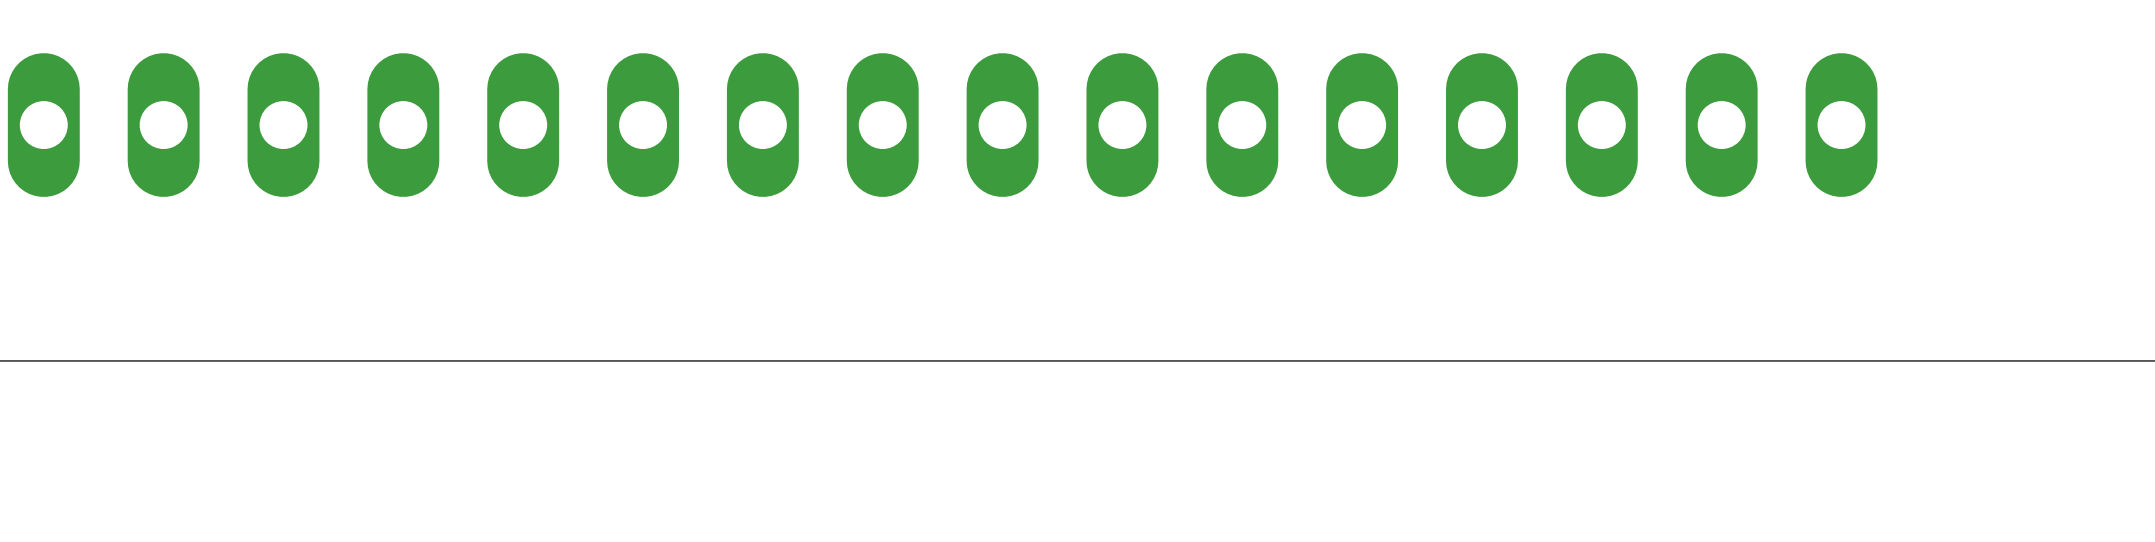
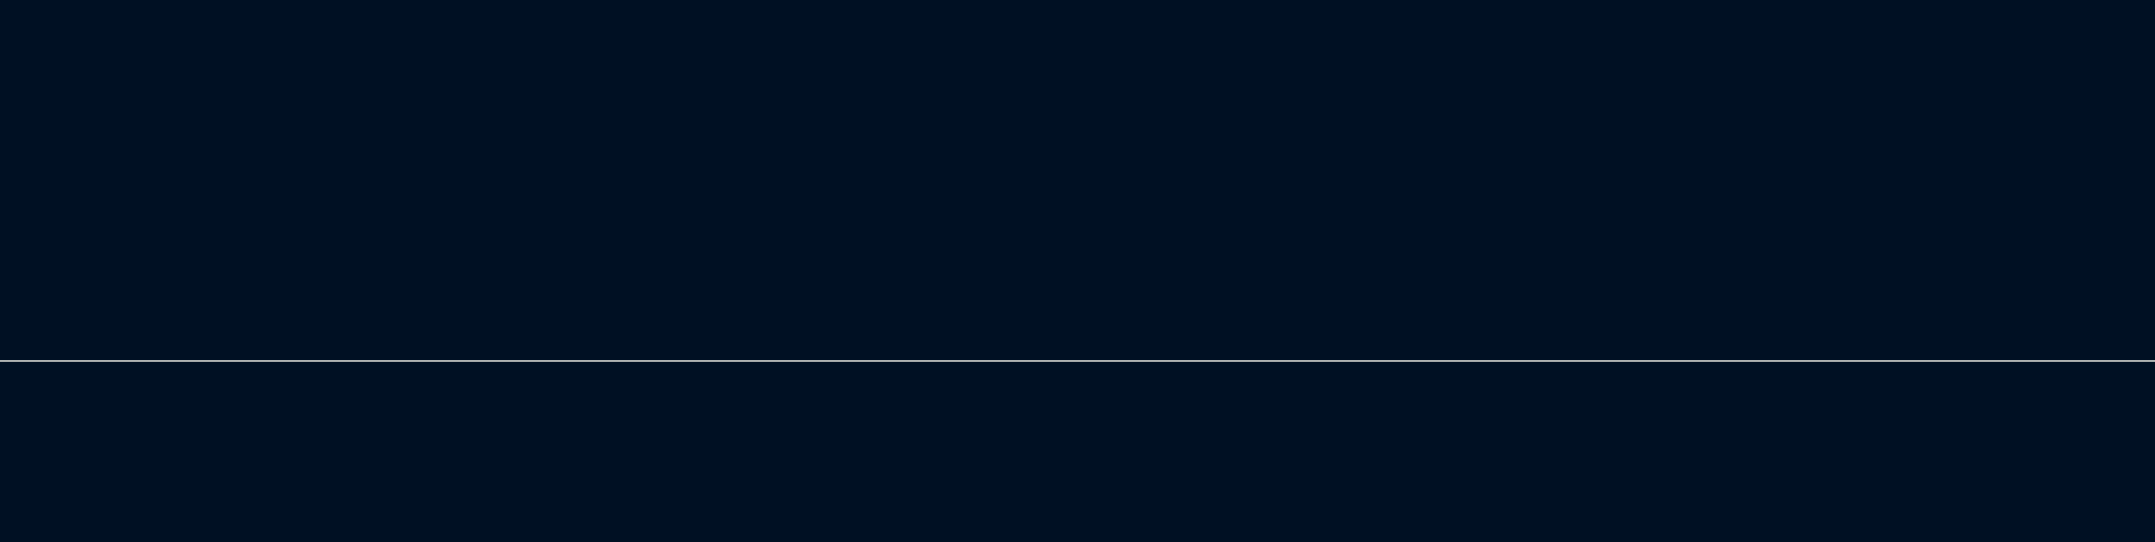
part: (942, 125) -> none

